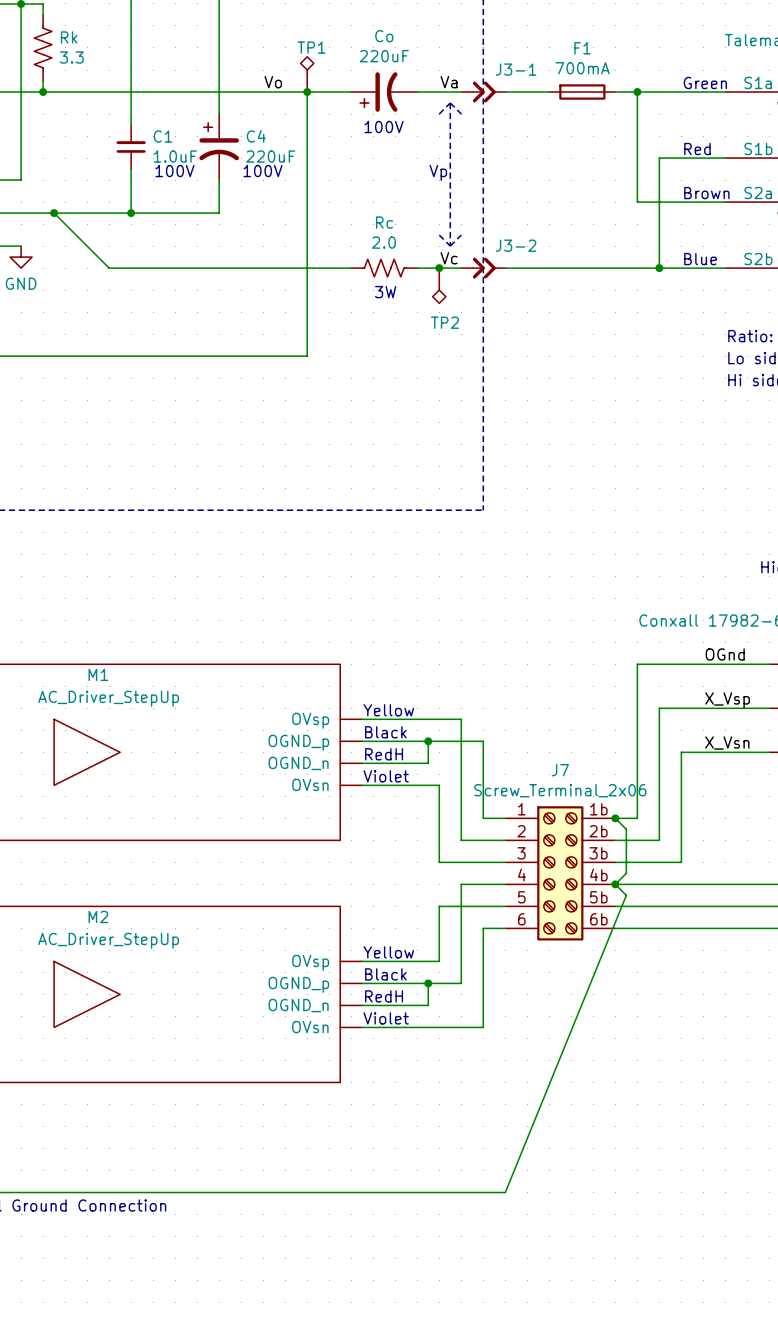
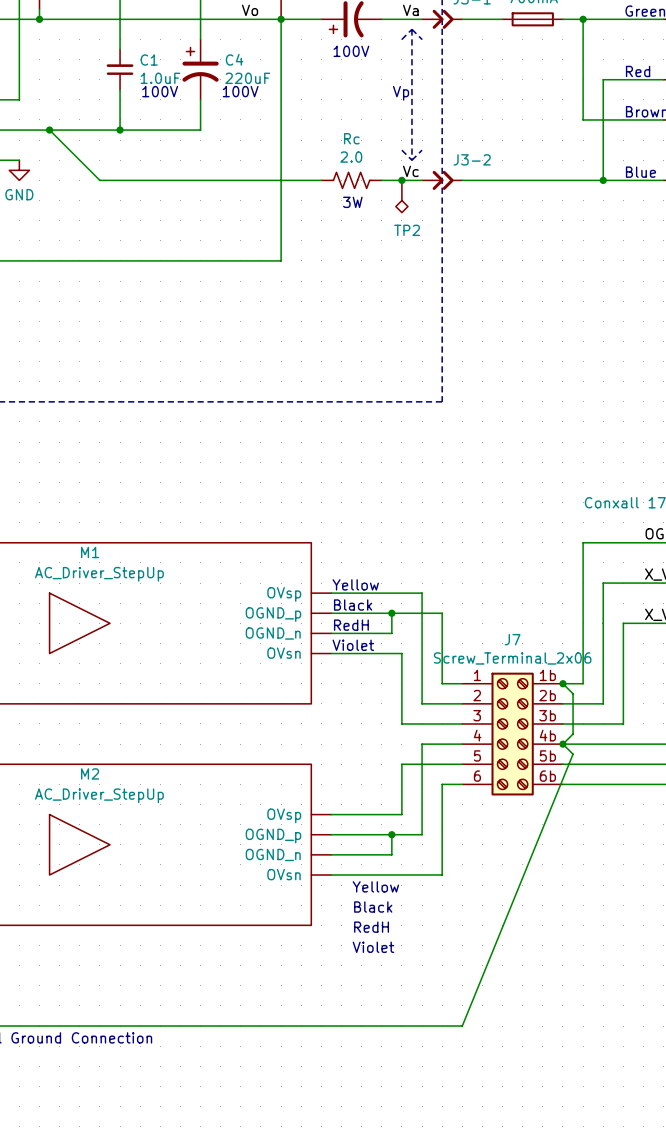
text position: Yellow (388, 952) -> Yellow (375, 886)
text position: Black (385, 974) -> Black (373, 907)
text position: RedH (384, 996) -> RedH (371, 927)
text position: Violet (386, 1018) -> Violet (373, 947)

